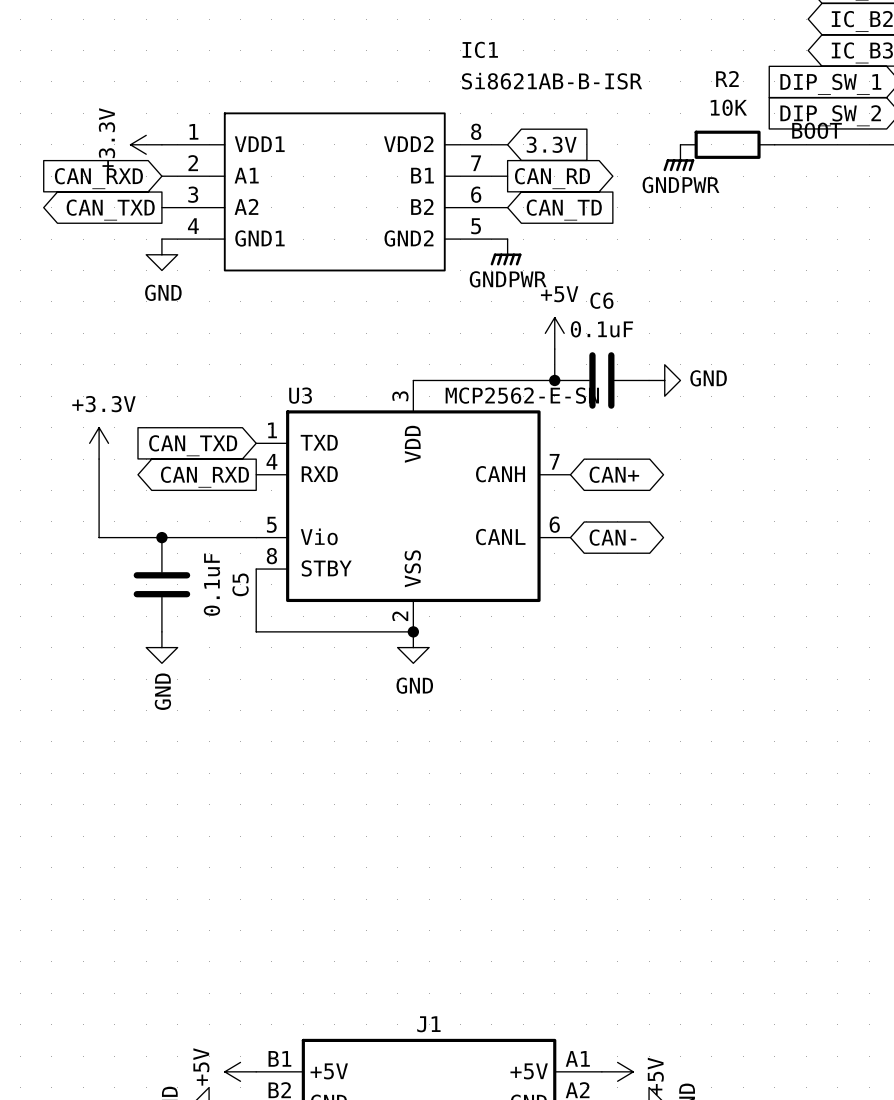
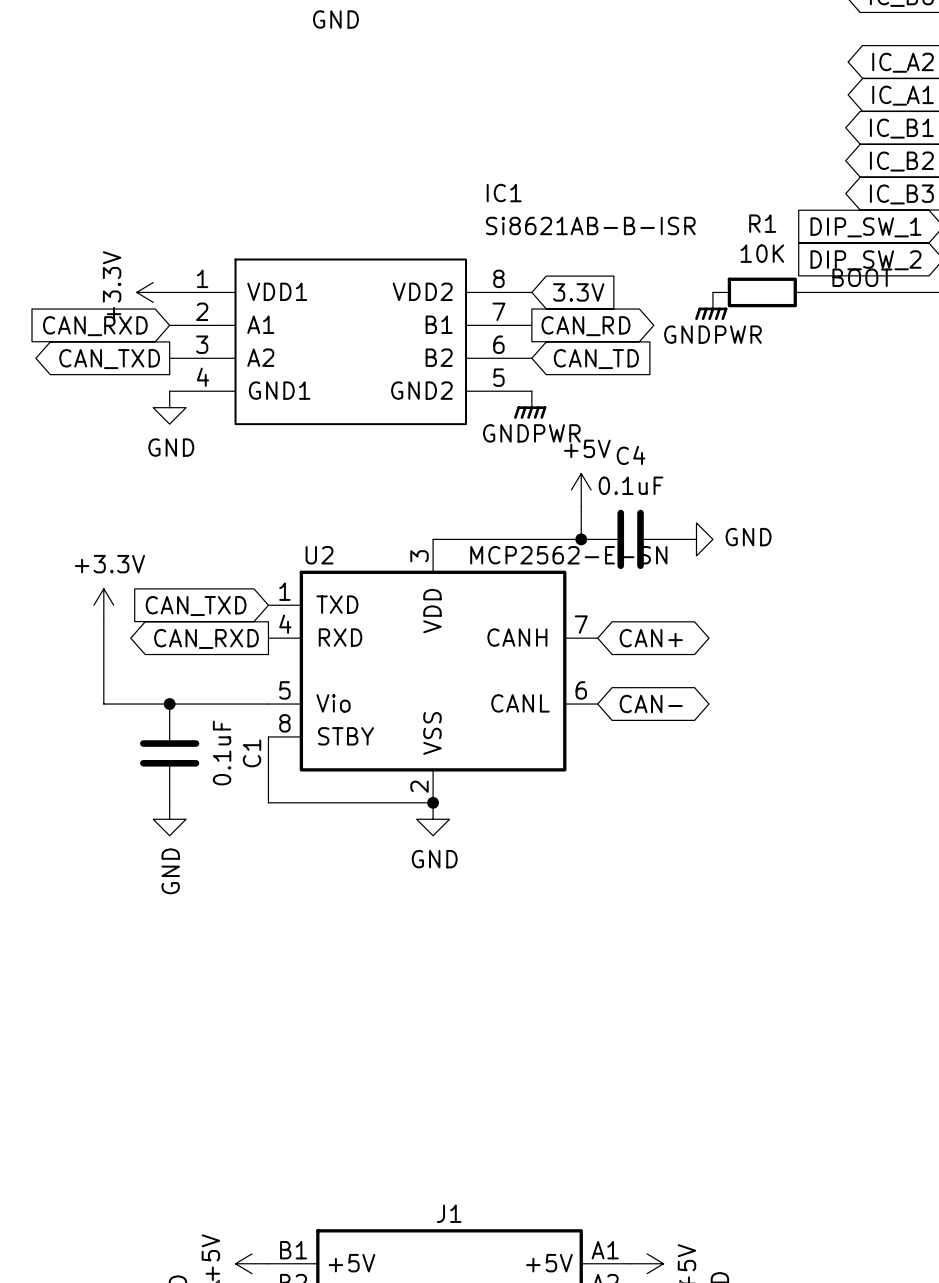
R2 name: R2 (727, 79) -> R1 (762, 223)
C6 name: C6 (601, 300) -> C4 (631, 455)
U3 name: U3 (300, 395) -> U2 (319, 555)
C5 name: C5 (240, 584) -> C1 (252, 753)

